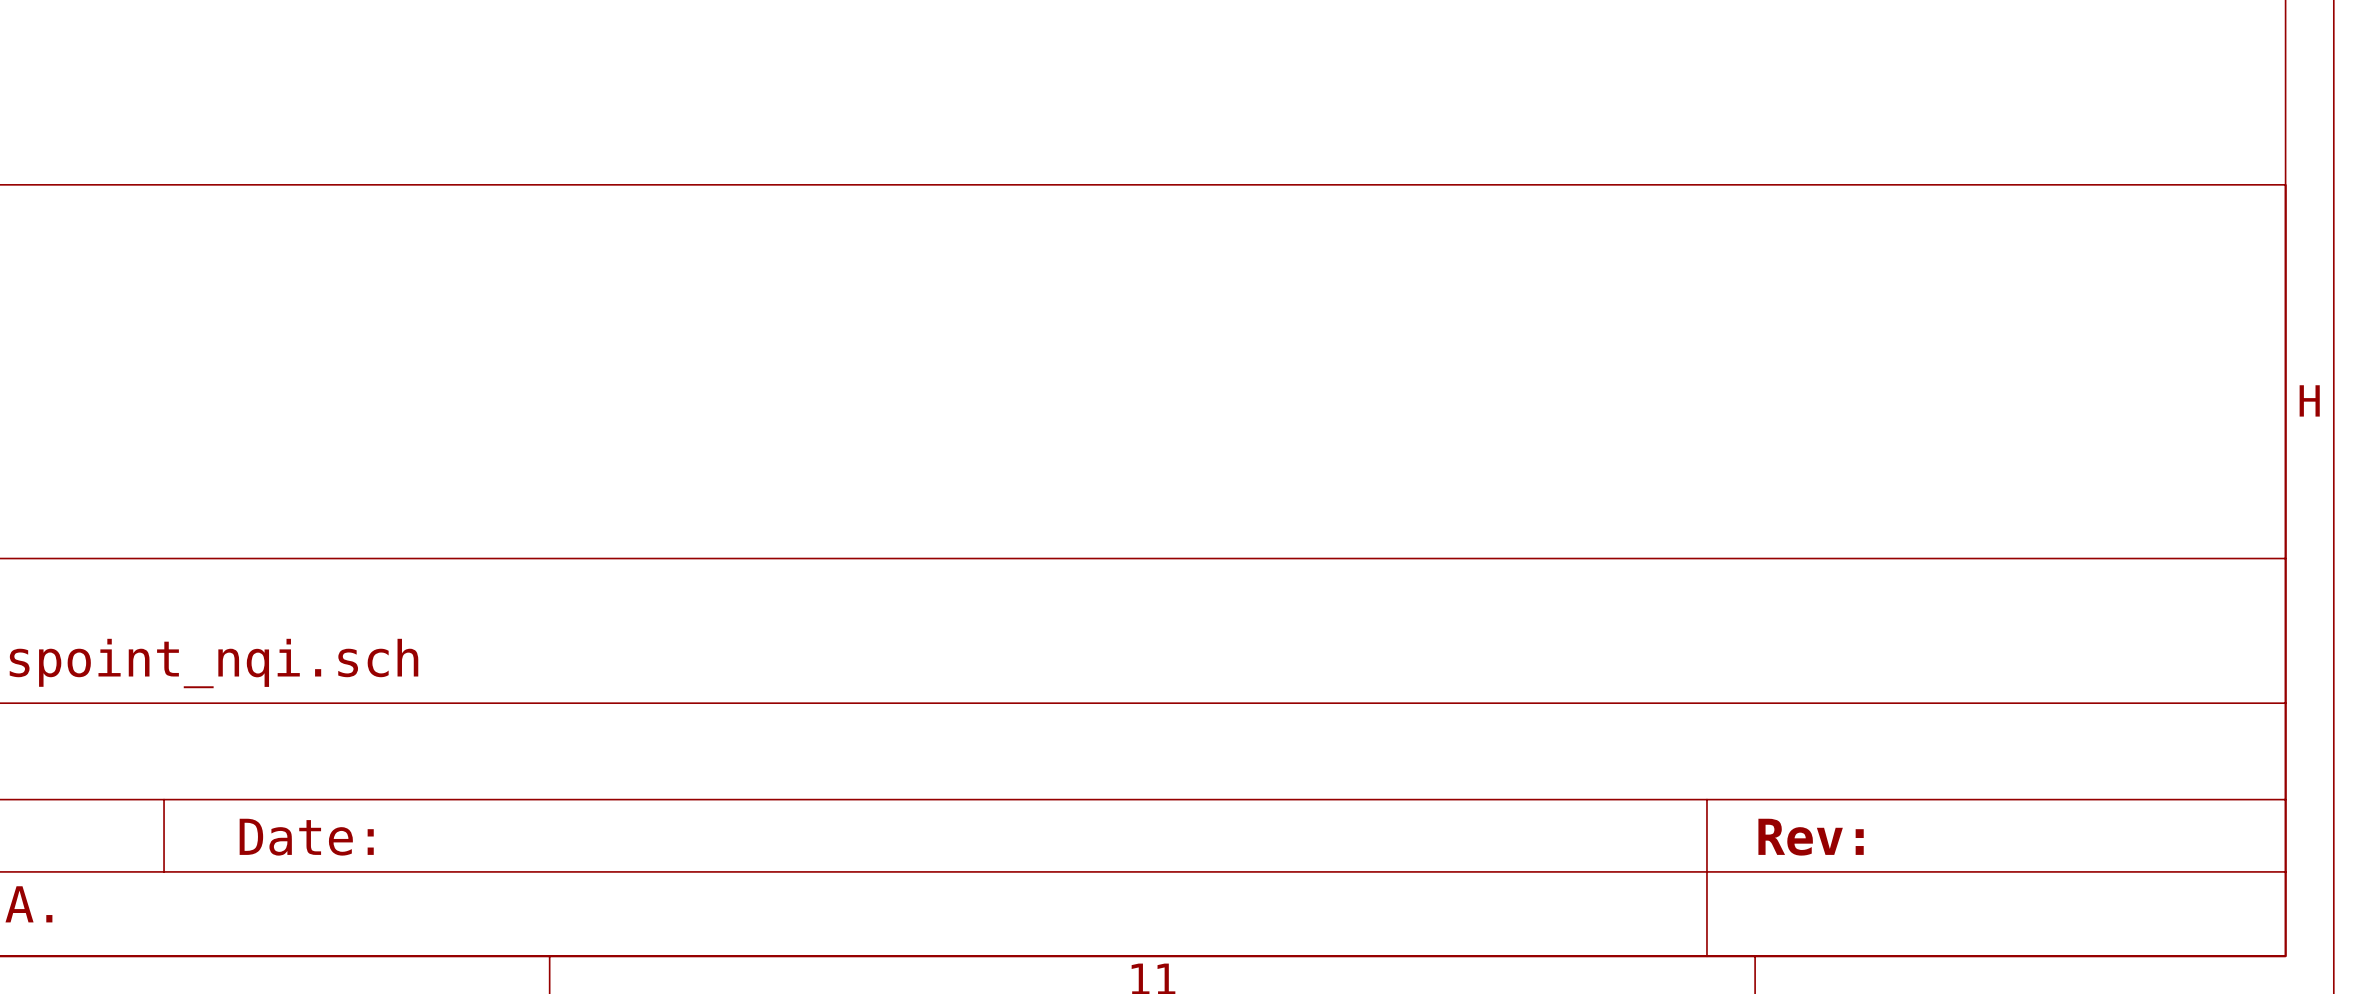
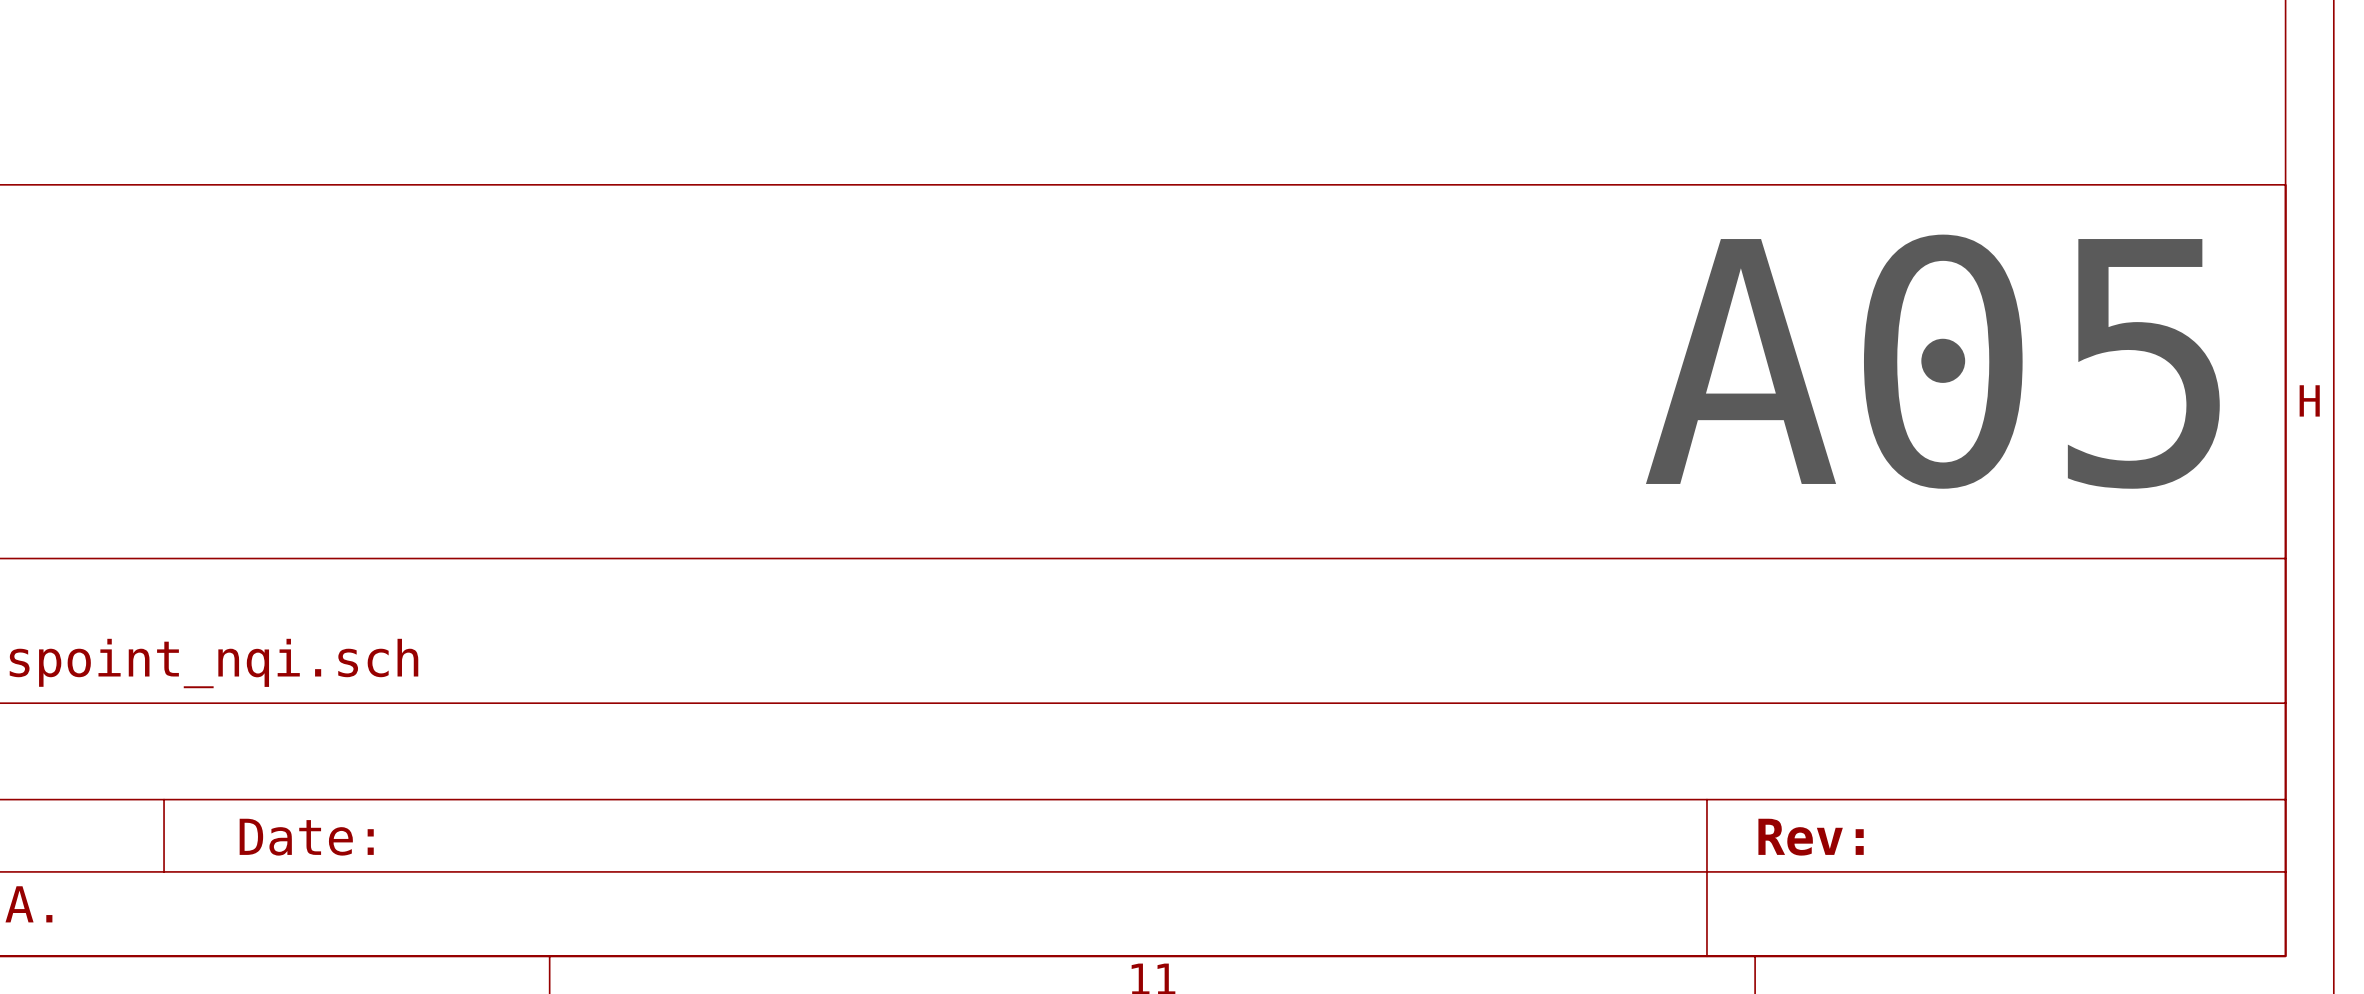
text: none -> A05 (1932, 361)

